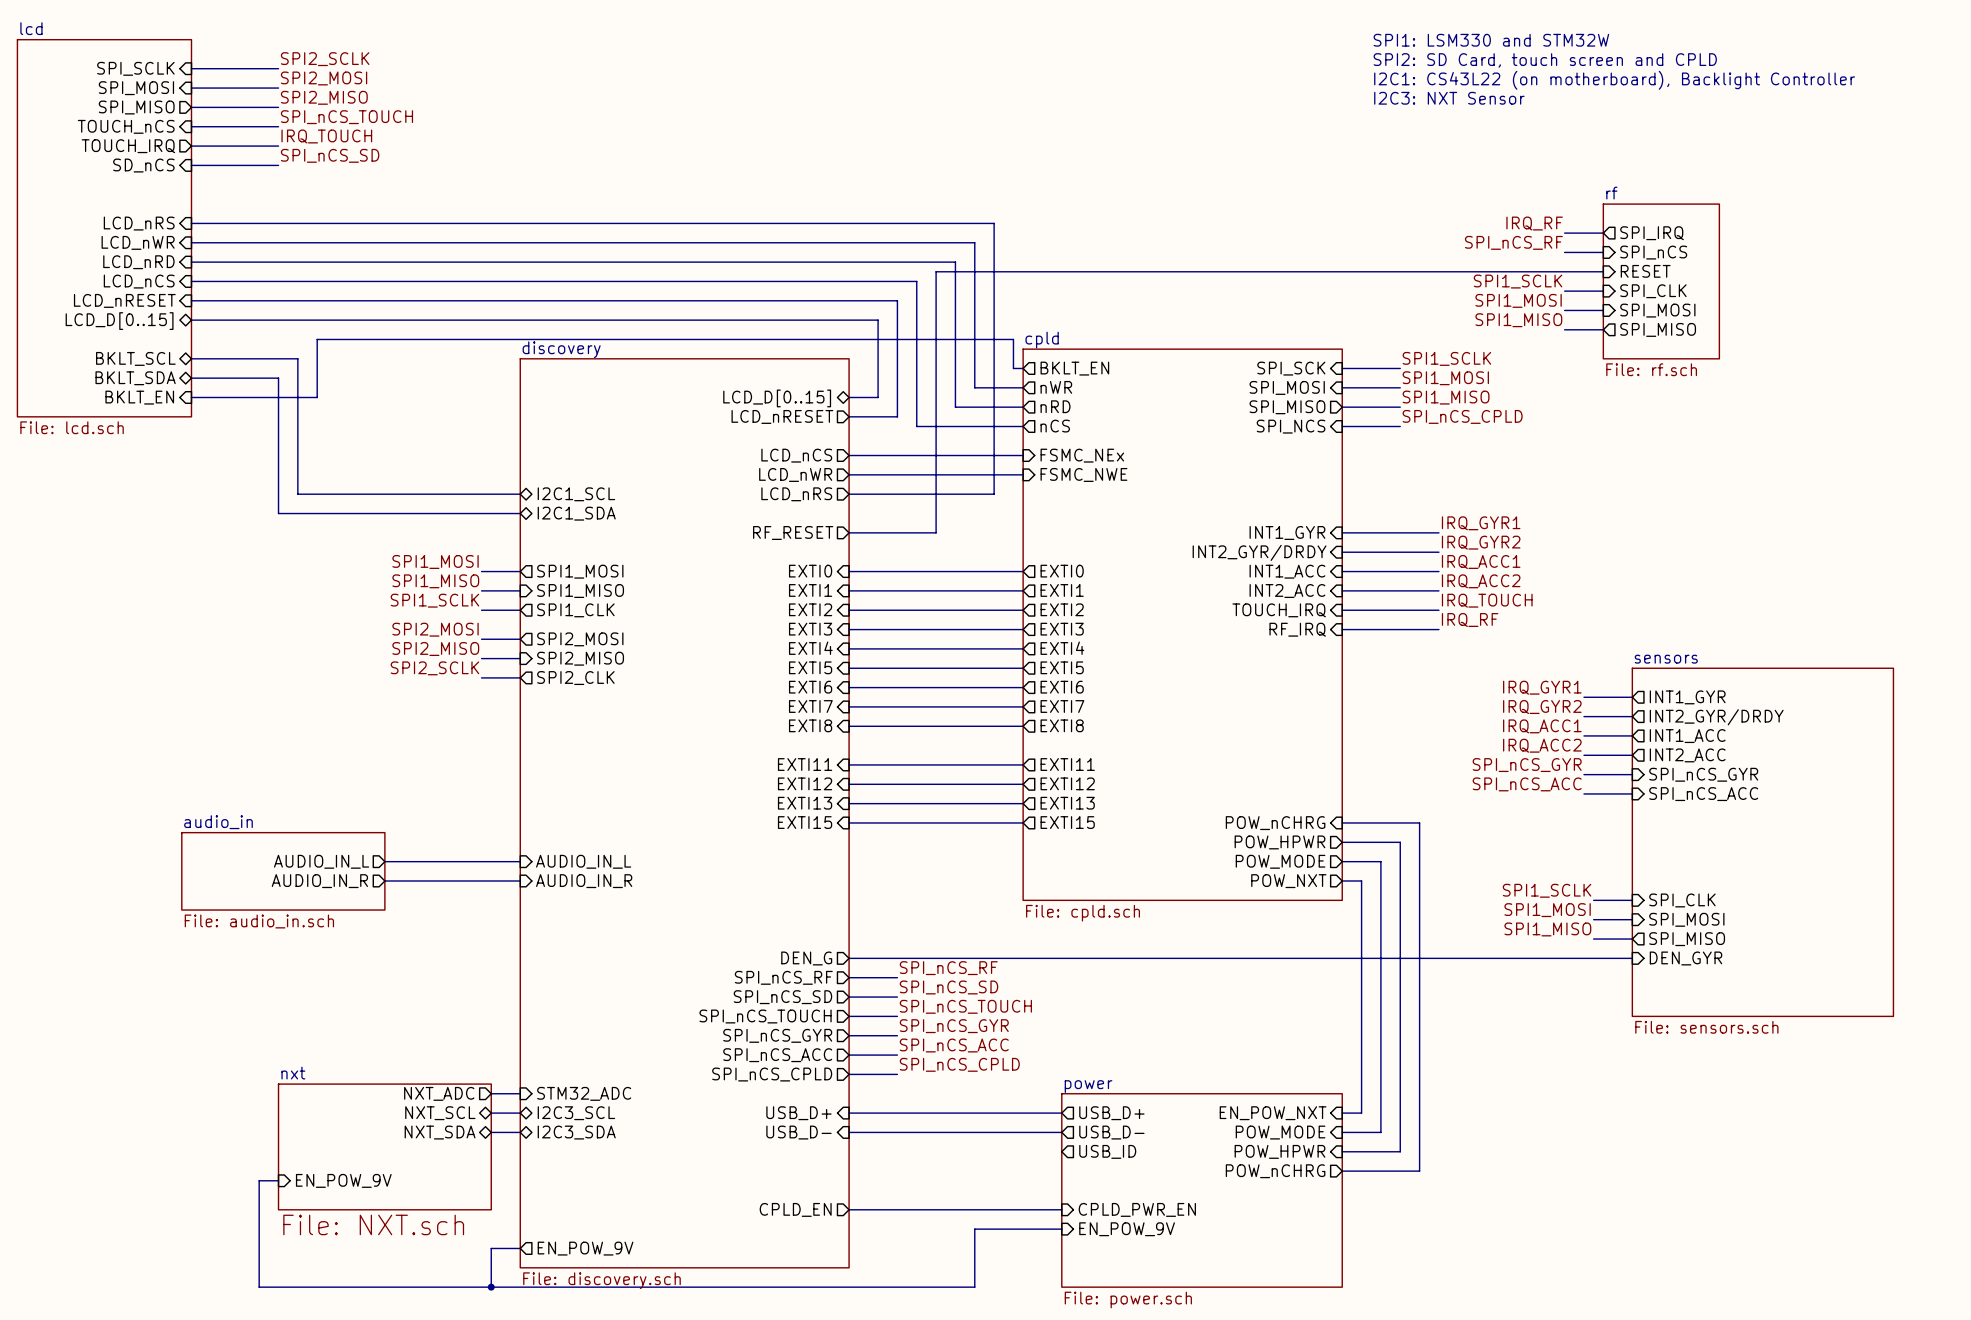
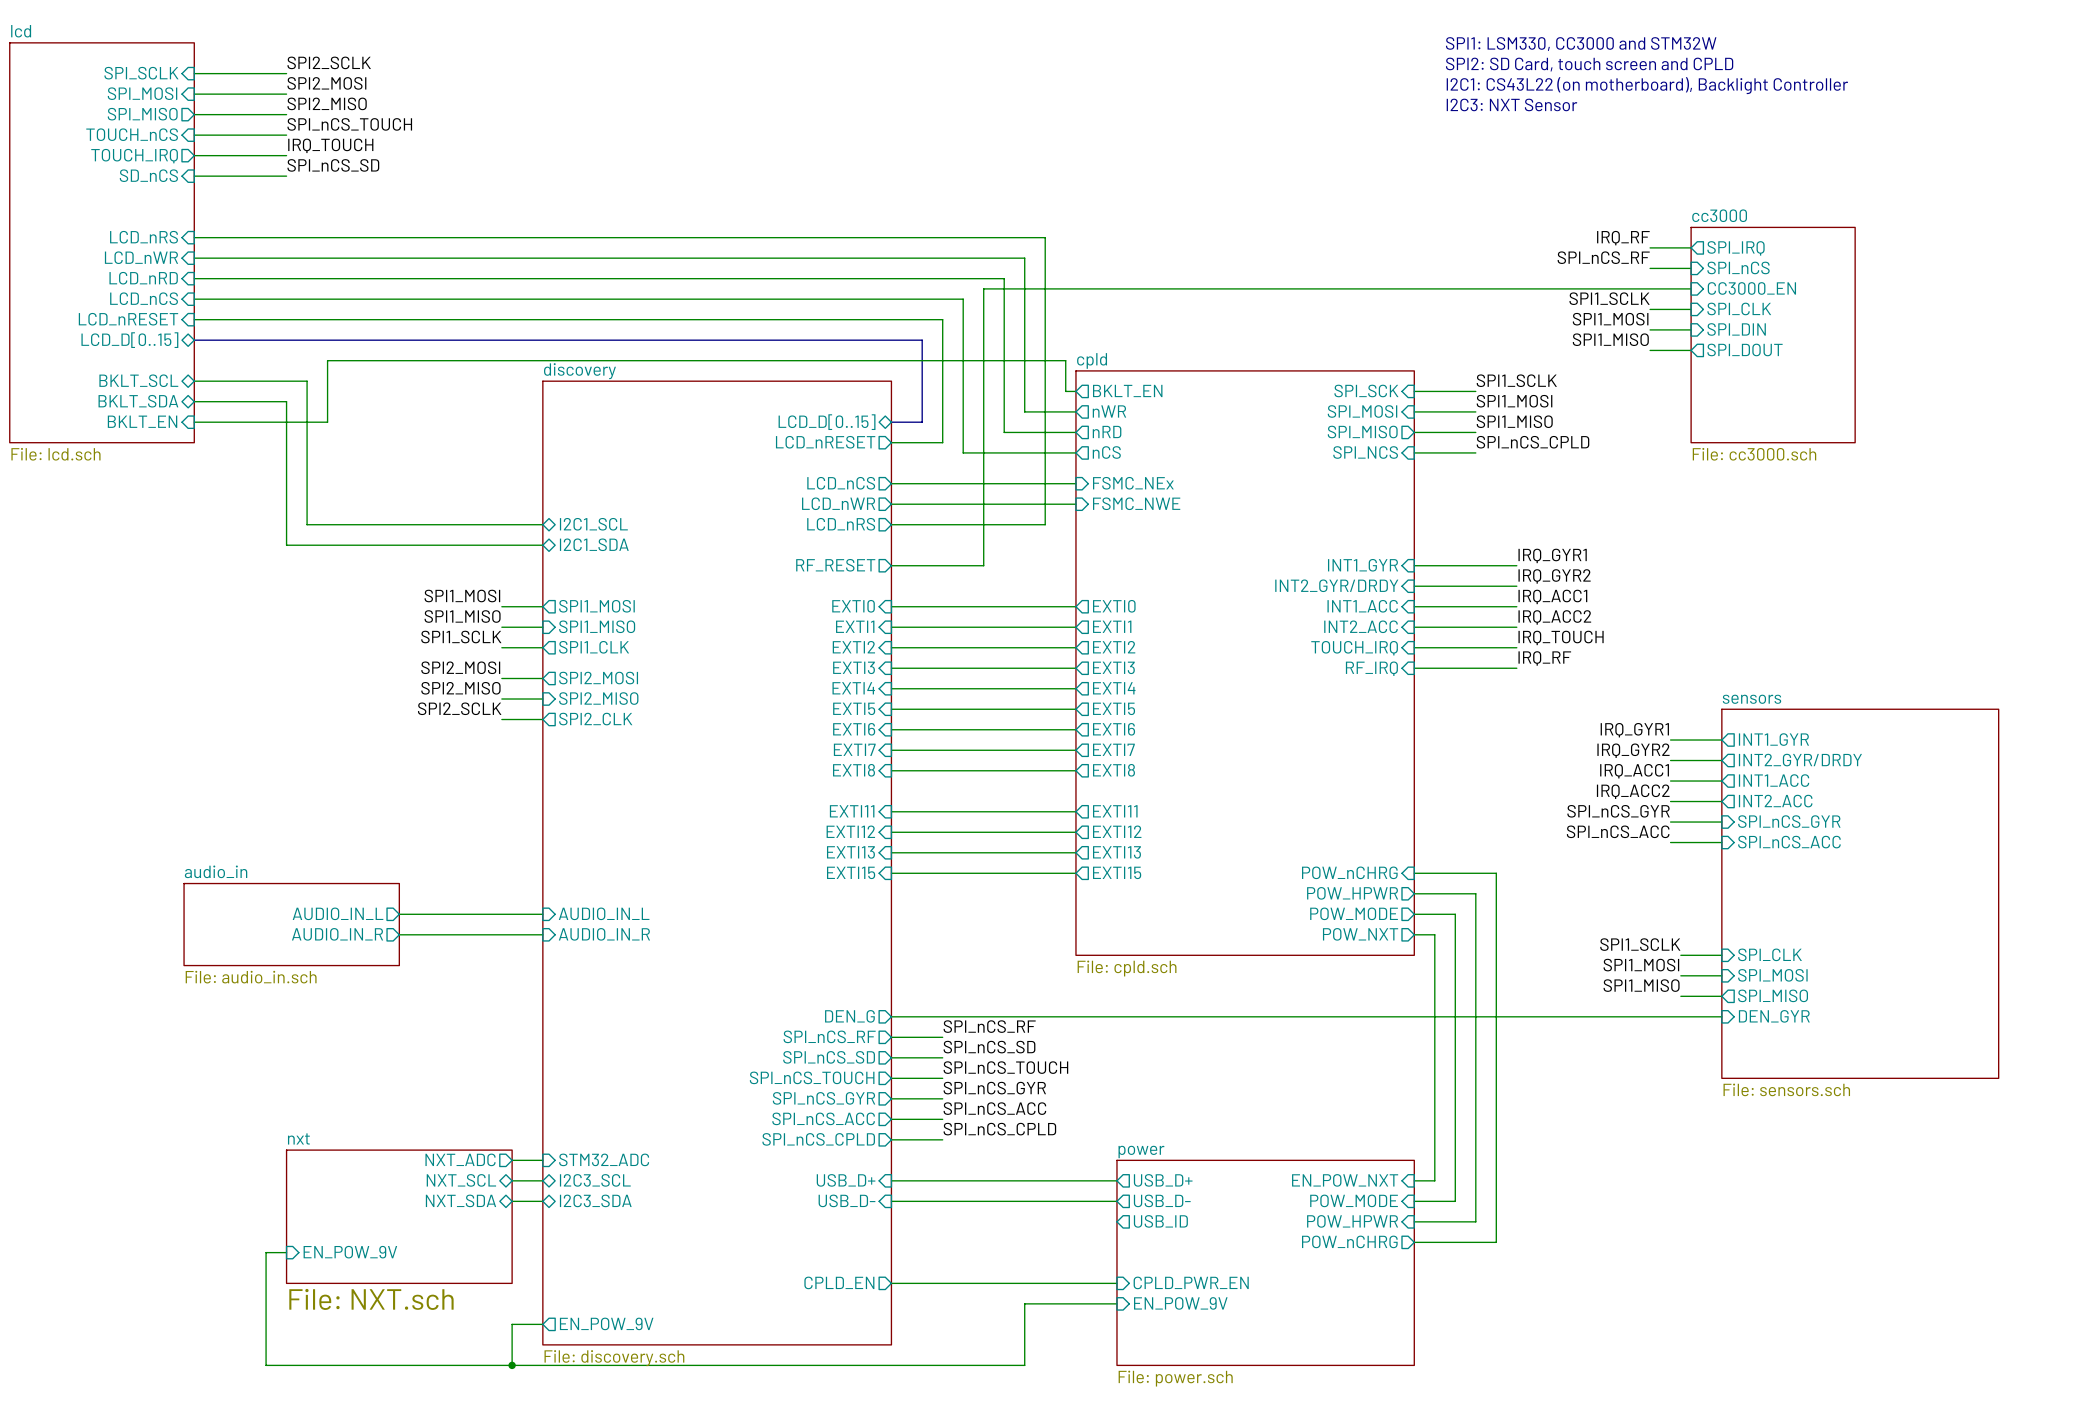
text: SPI1: LSM330 and STM32W (1491, 40) -> SPI1: LSM330, CC3000 and STM32W (1581, 44)
sheet pin: RESET (1645, 271) -> CC3000_EN (1751, 288)
sheet rf: File: rf.sch (1661, 281) -> none
sheet pin: SPI_MOSI (1657, 310) -> SPI_DIN (1736, 329)
sheet cc3000: none -> File: cc3000.sch (1773, 335)
sheet pin: SPI_MISO (1658, 329) -> SPI_DOUT (1745, 349)

